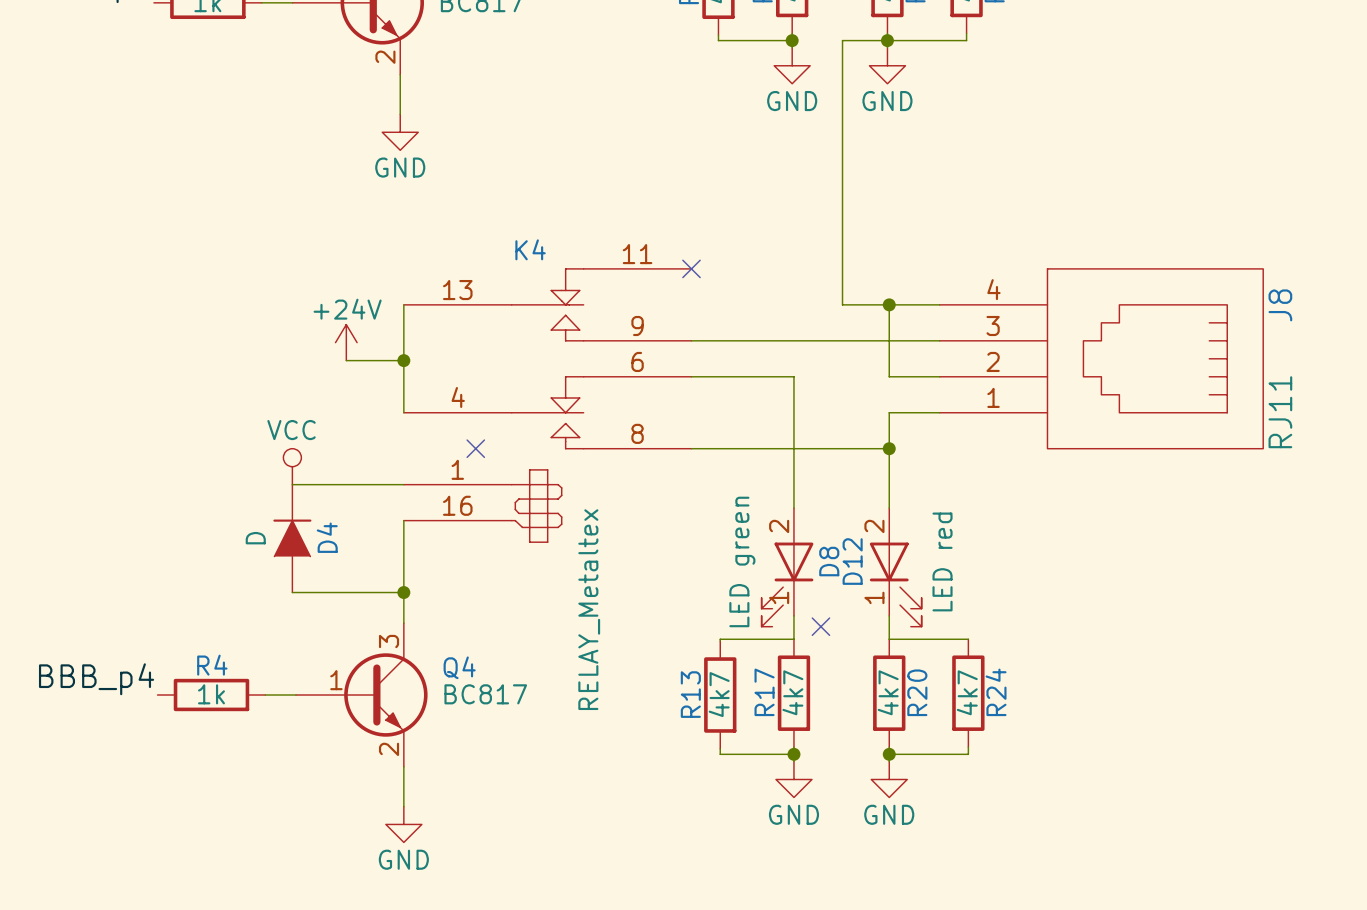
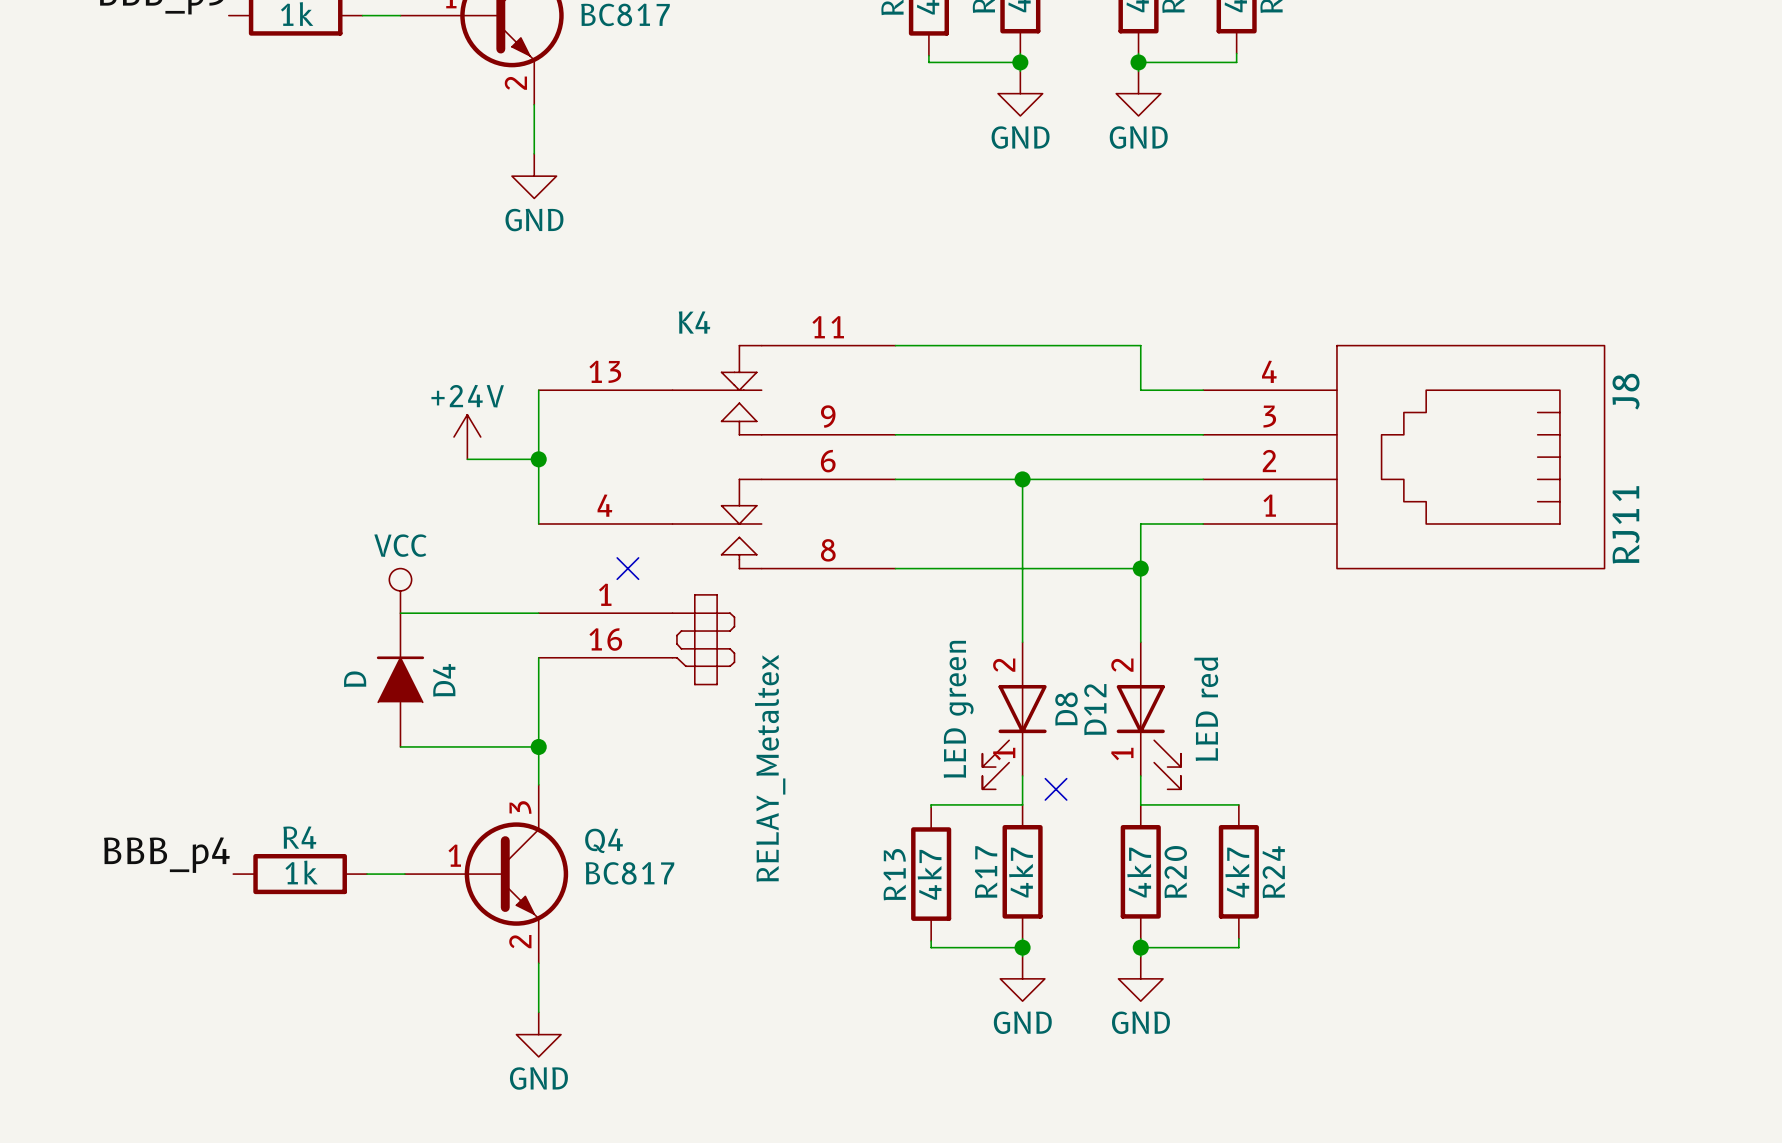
wire: (887, 40) (842, 40) (842, 304) (889, 304) (889, 376) -> (1022, 479) (1140, 479)
wire: none -> (895, 345) (1140, 345) (1140, 390)
no-connect mark: (691, 268) -> none
junction: (889, 304) -> none
junction: none -> (1022, 479)

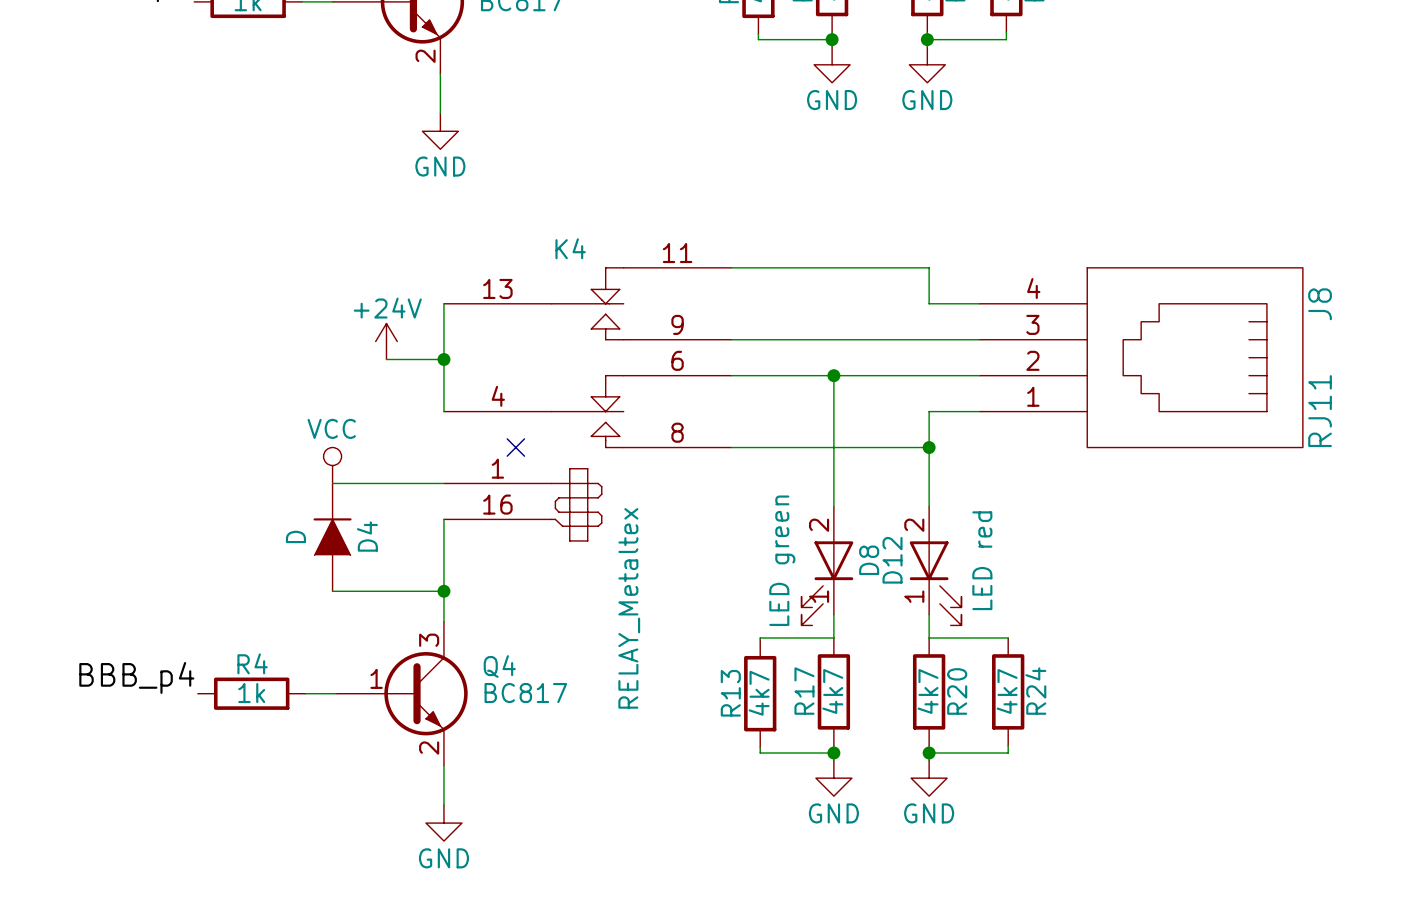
no-connect mark: (1056, 789) -> none

